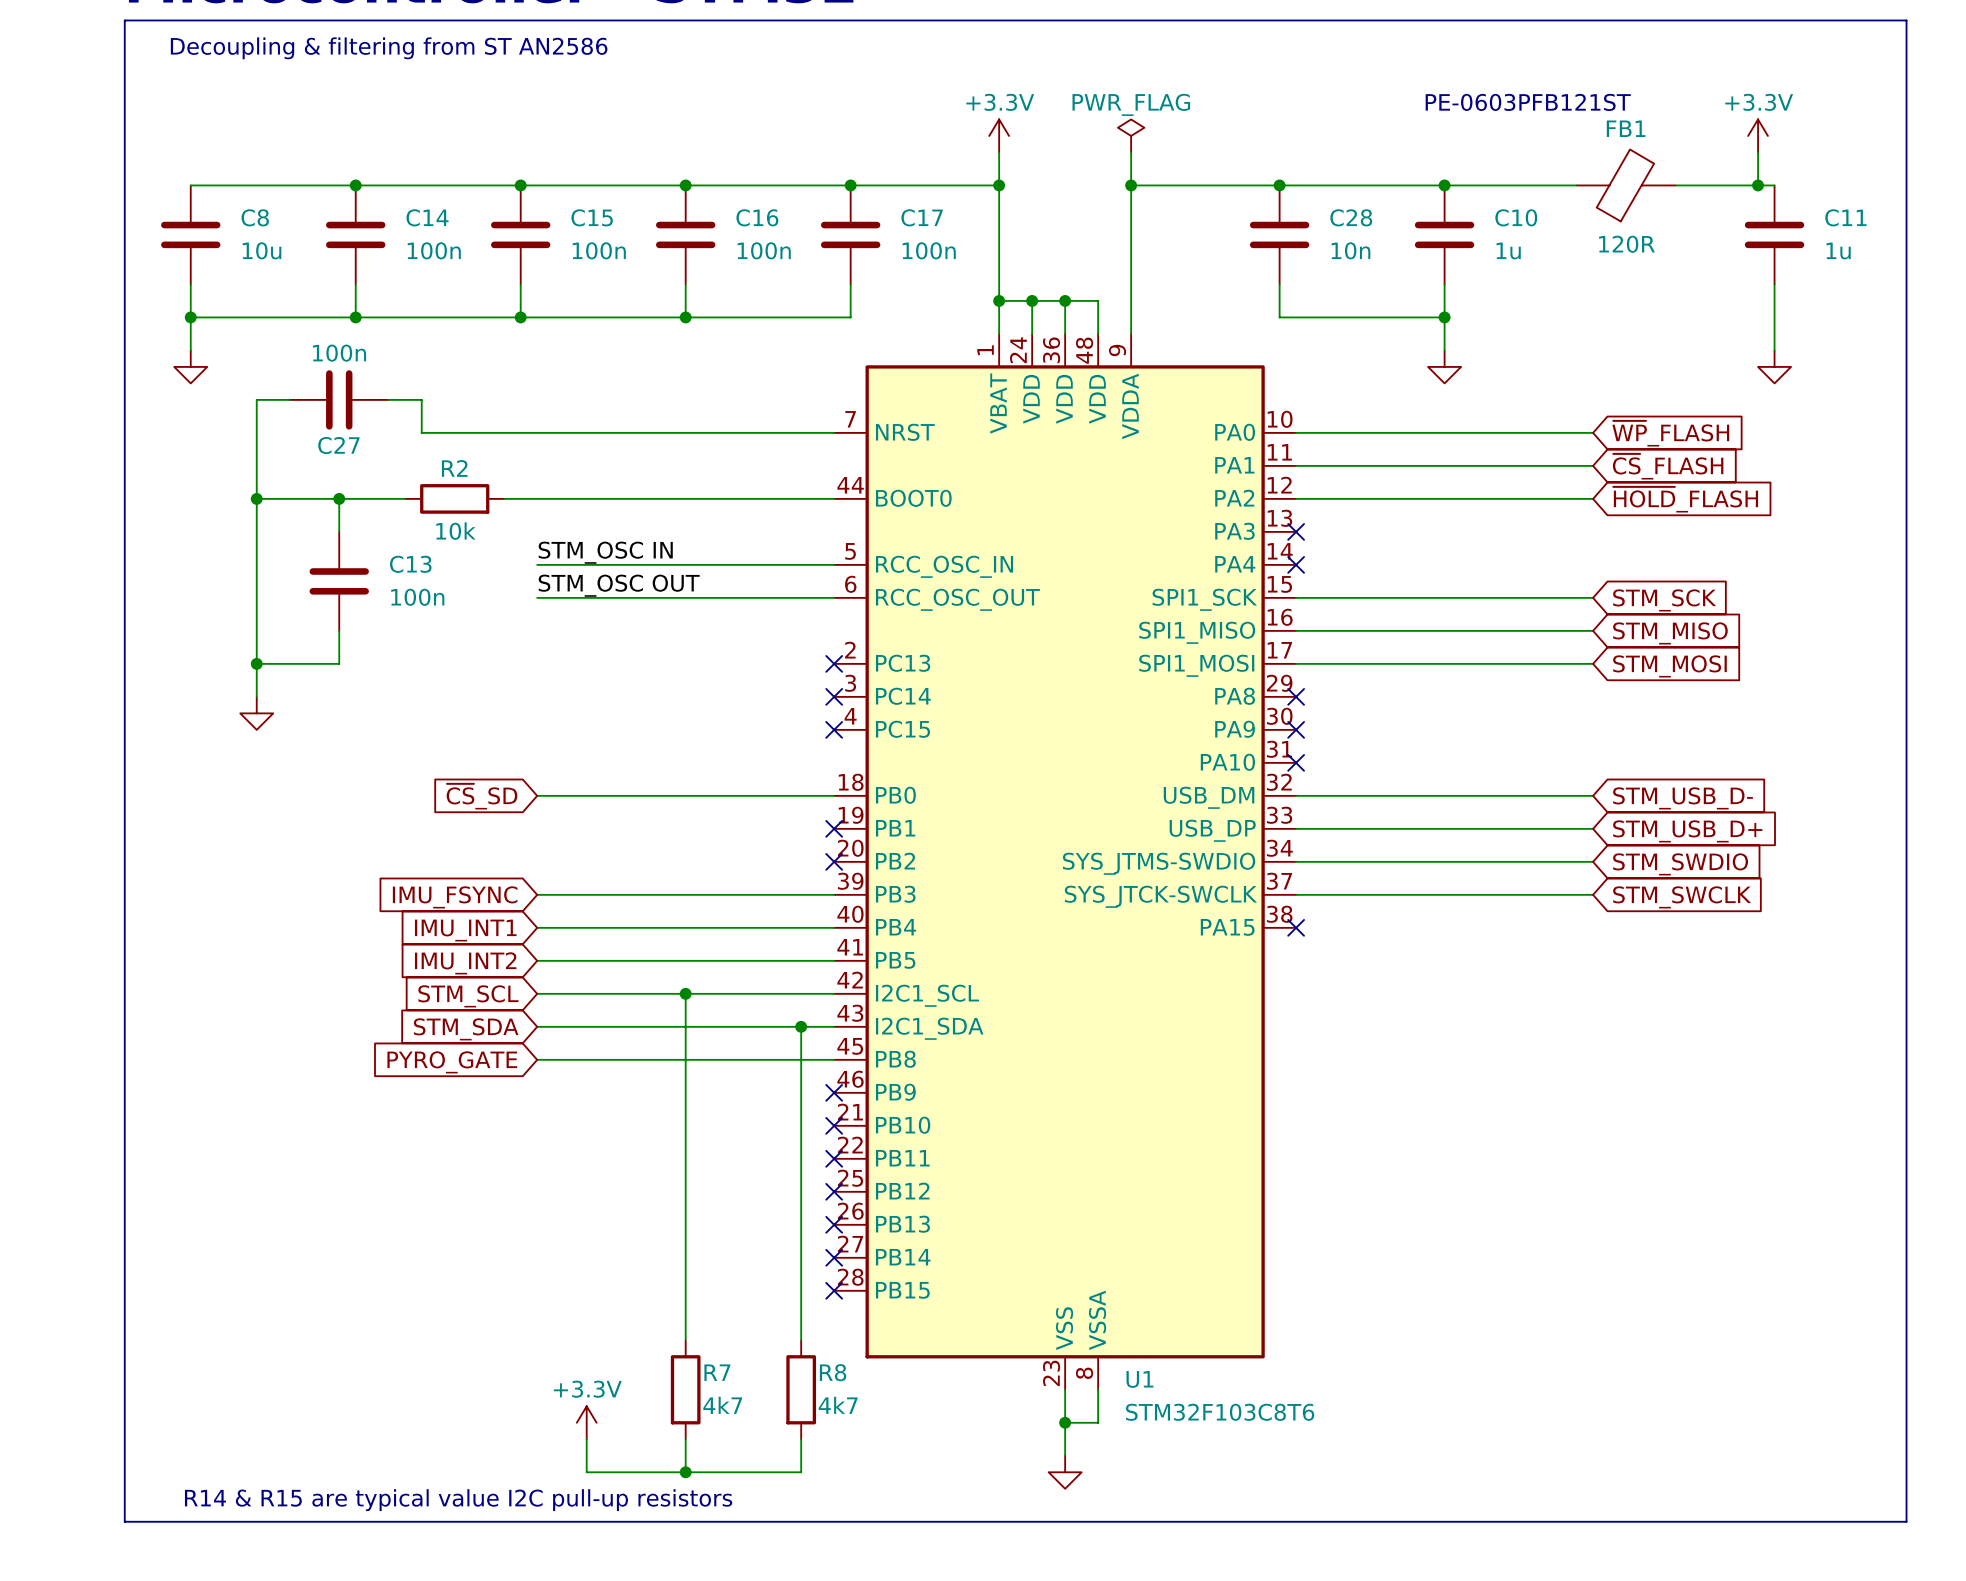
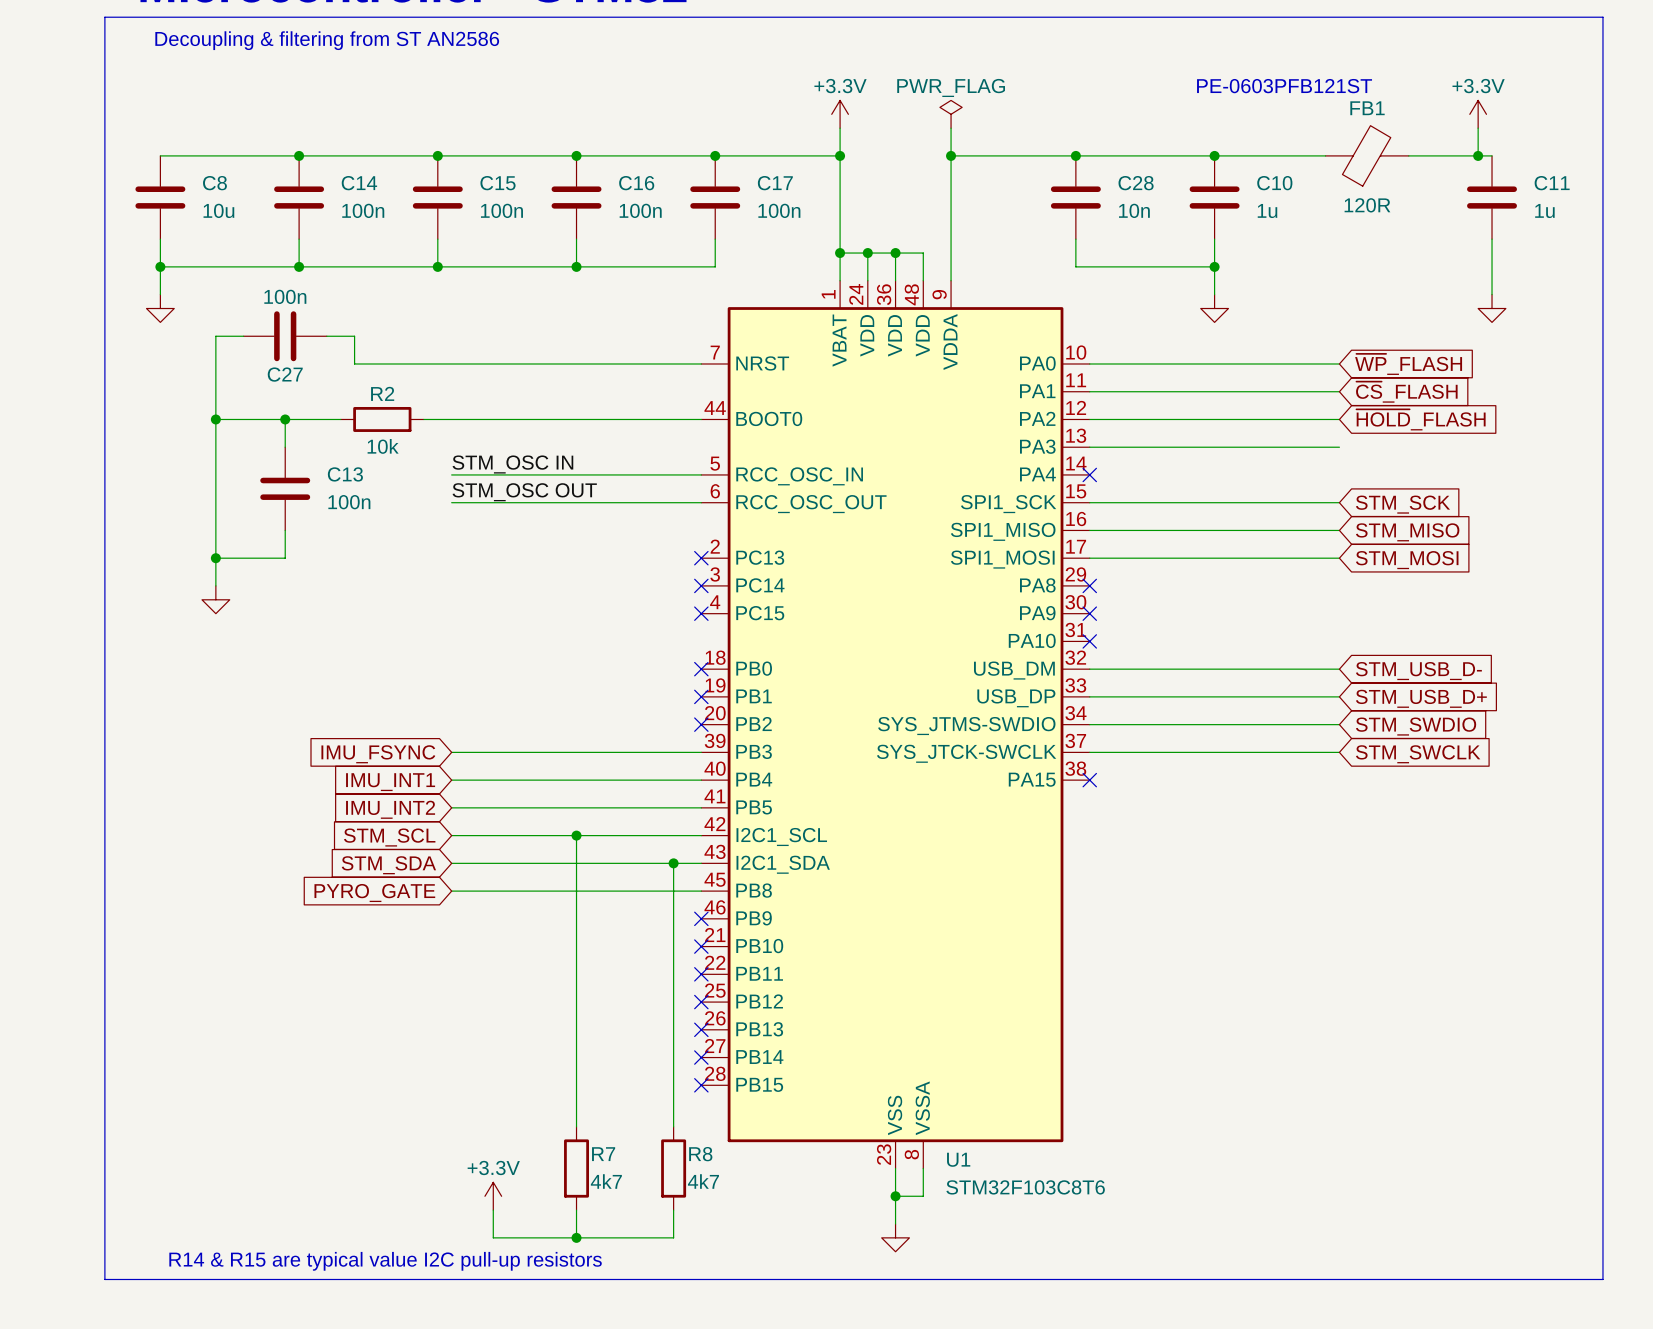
wire: none -> (1089, 447) (1339, 447)
no-connect mark: (1296, 531) -> none
wire: (537, 795) (834, 795) -> none
no-connect mark: none -> (701, 669)
global label: ~{CS}_SD (481, 796) -> none

